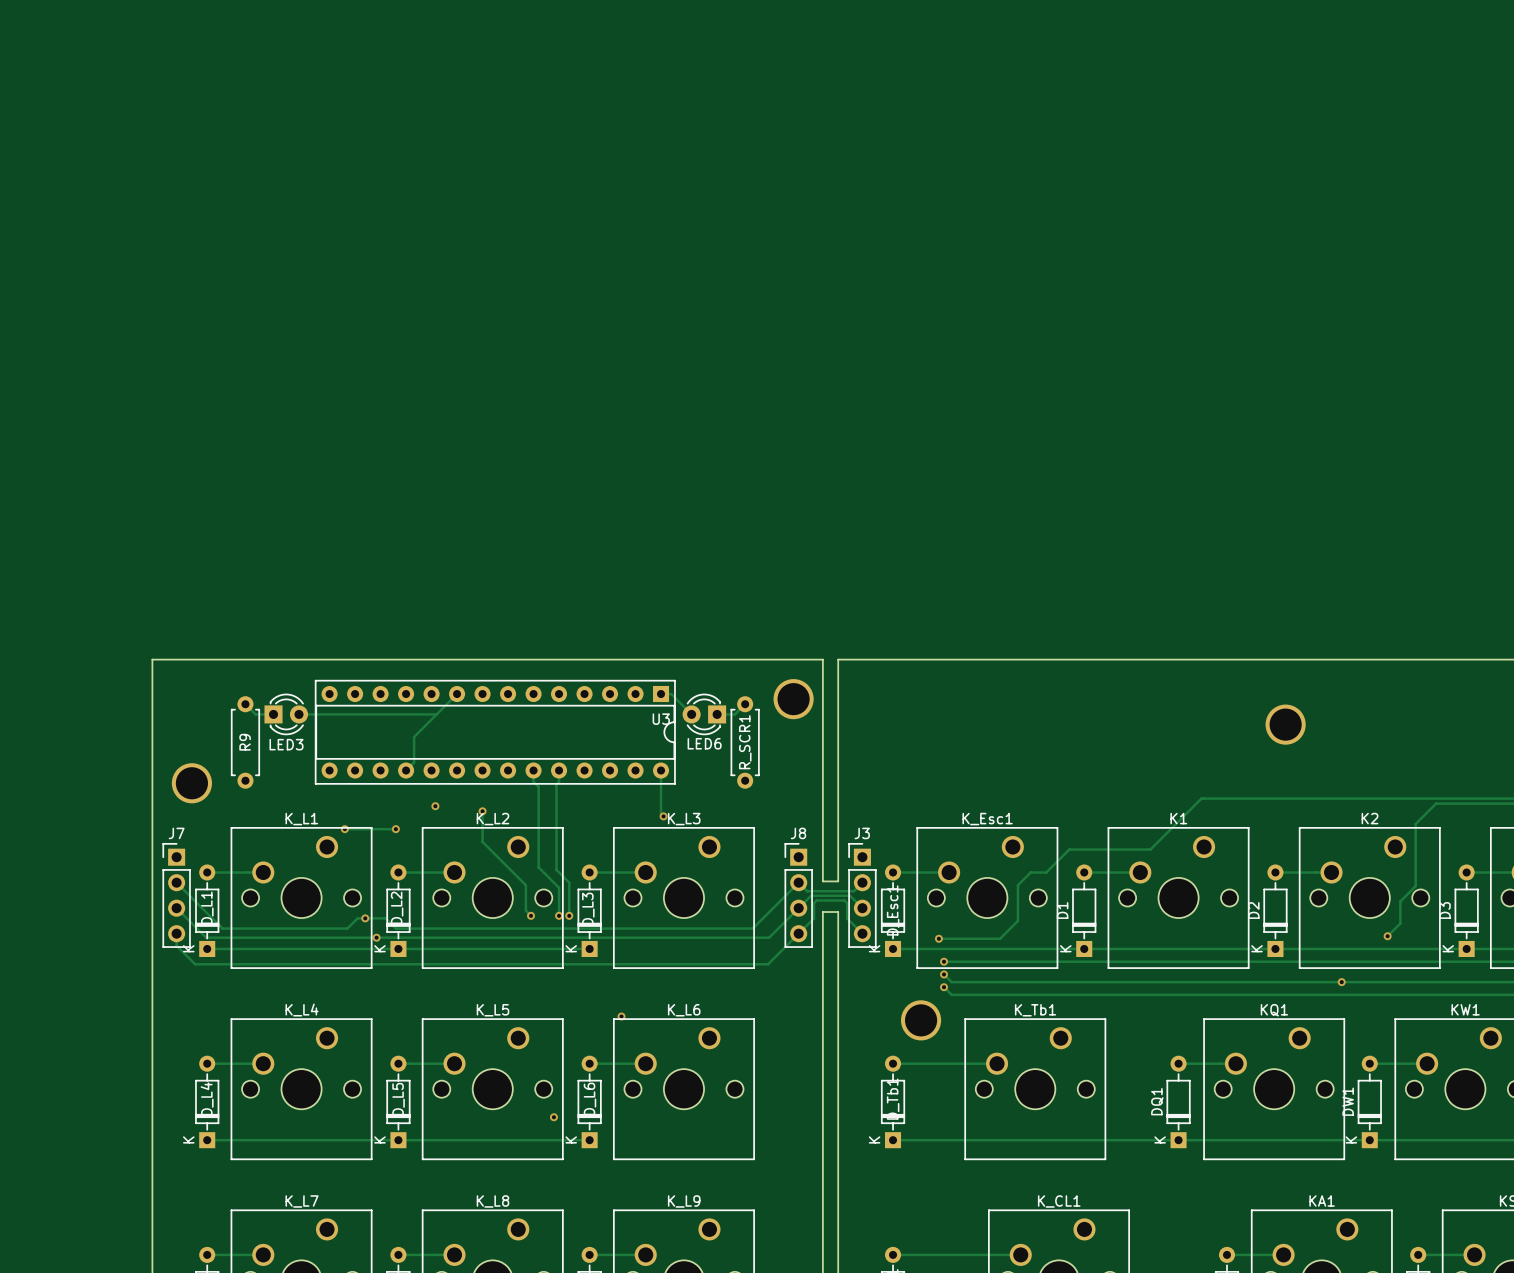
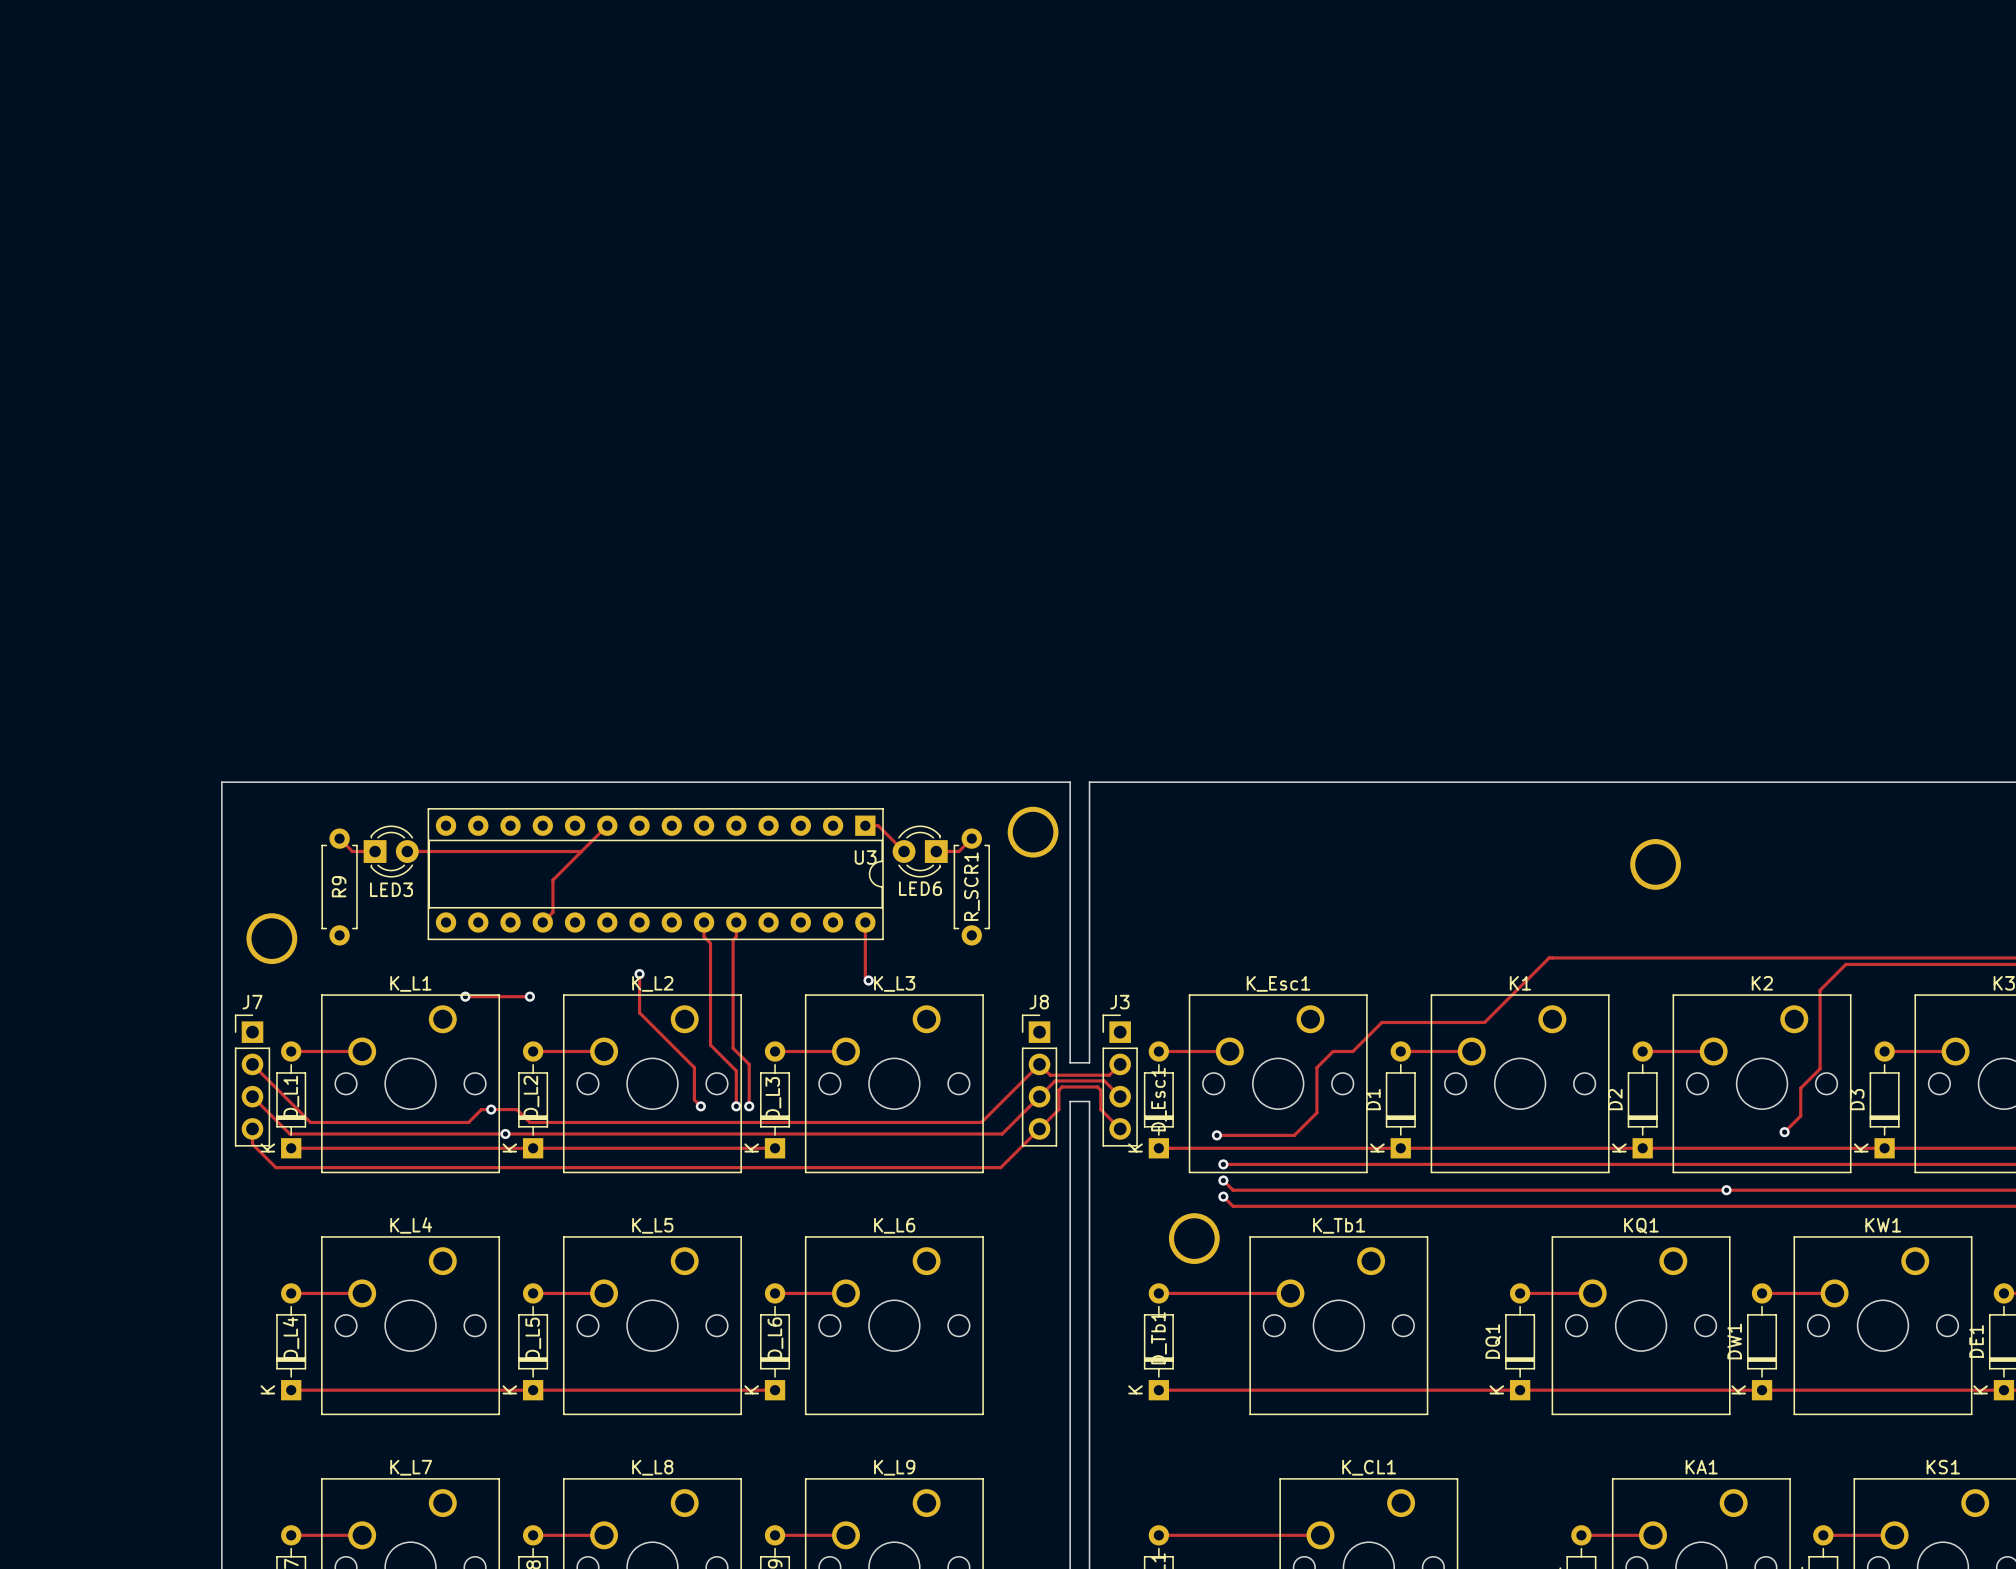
via: (435, 806) -> none
via: (621, 1016) -> none
via: (553, 1117) -> none

